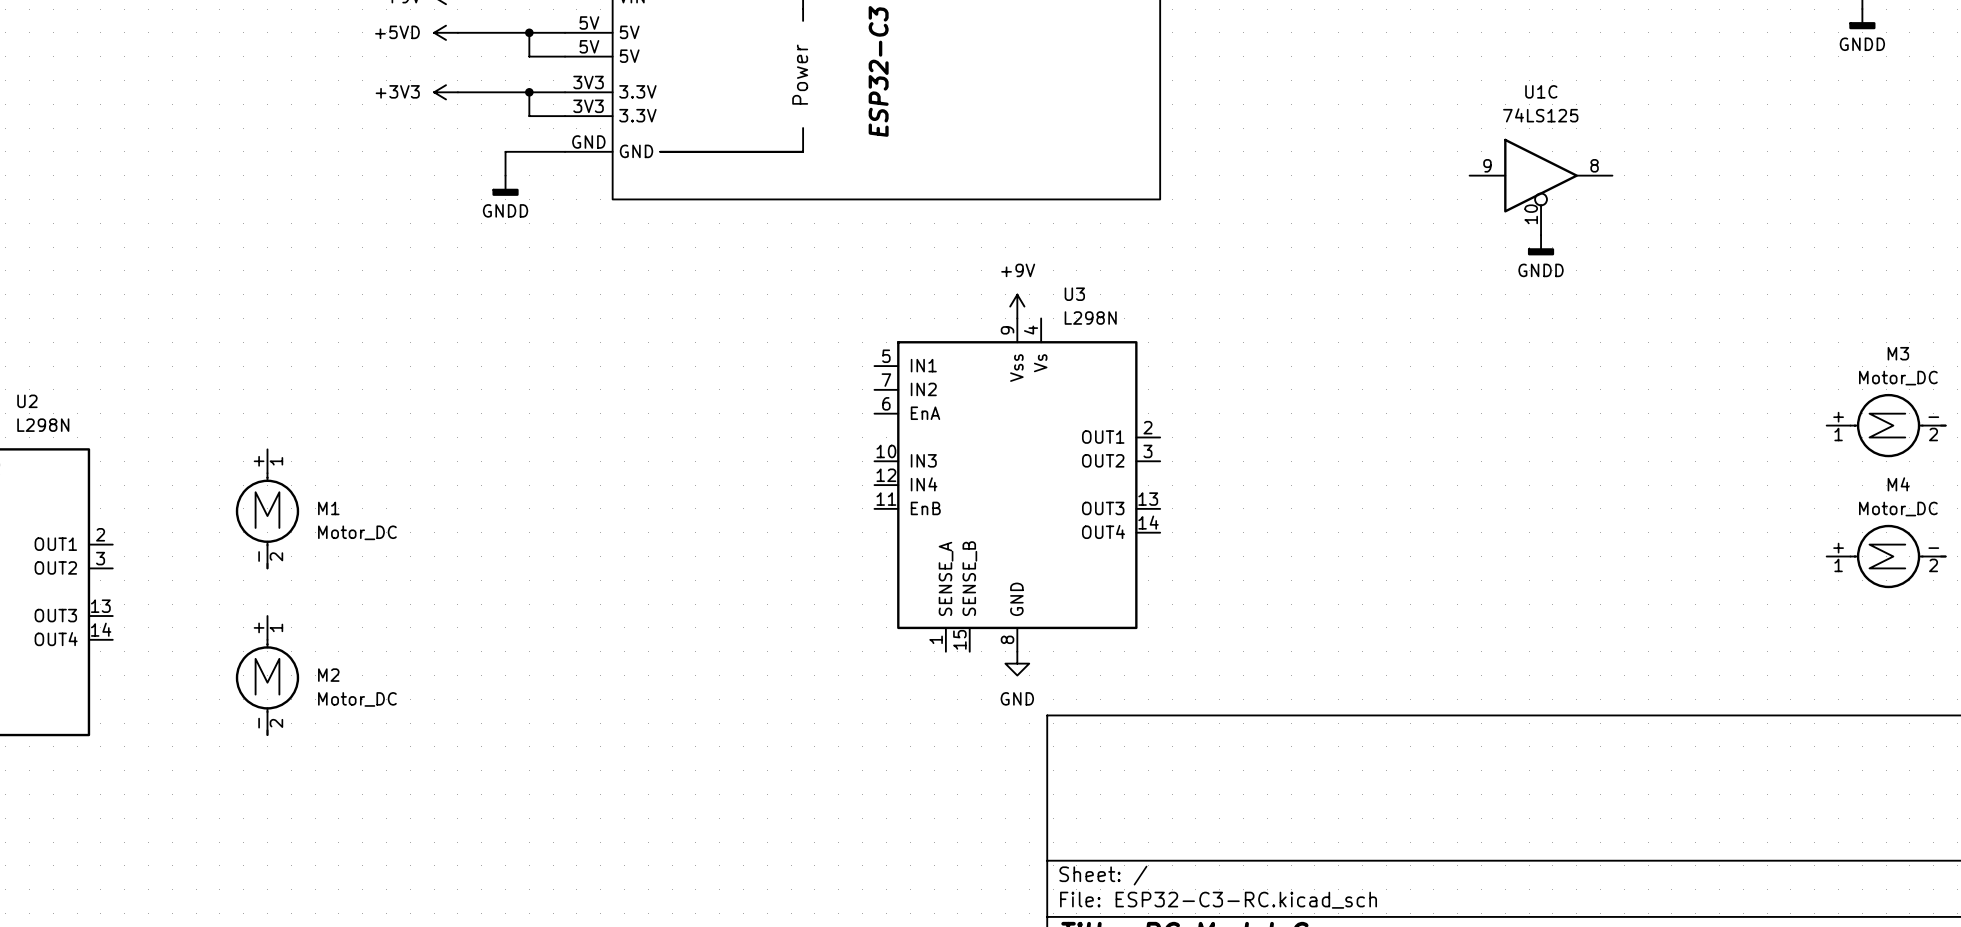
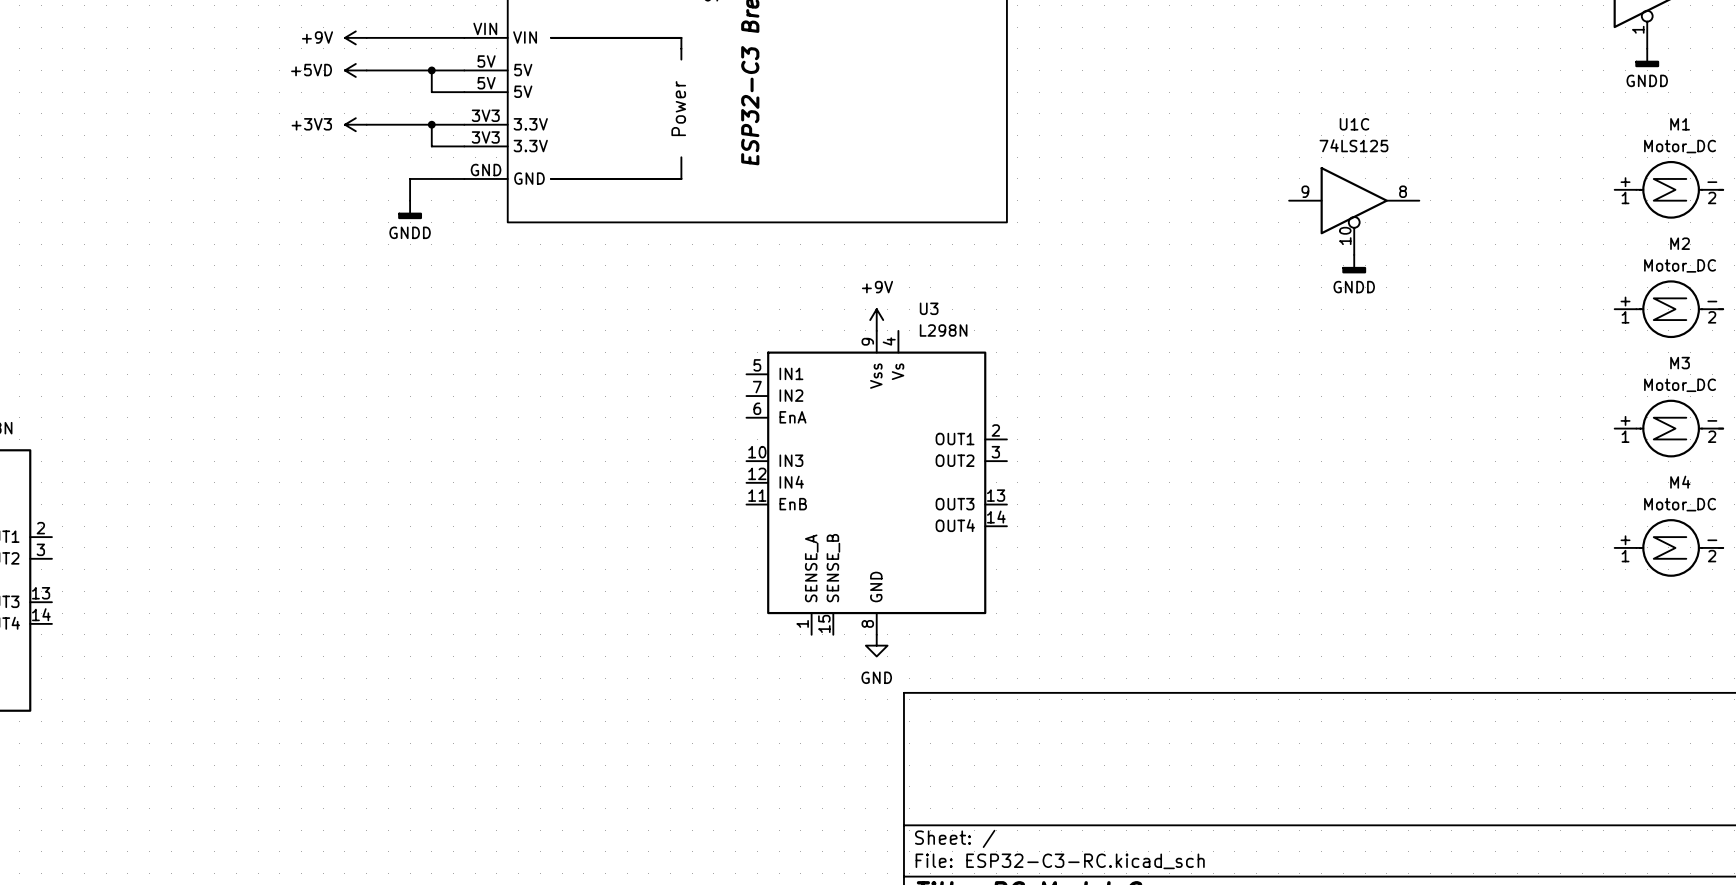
M1 position: (267, 508) -> (1668, 189)
M1 rotation: 0° (267, 520) -> 90° counterclockwise (1679, 189)
M1 value position: Motor_DC (357, 532) -> Motor_DC (1680, 146)
M2 position: (267, 675) -> (1668, 309)
M2 rotation: 0° (267, 687) -> 90° counterclockwise (1679, 309)
M2 value position: Motor_DC (357, 699) -> Motor_DC (1680, 265)

